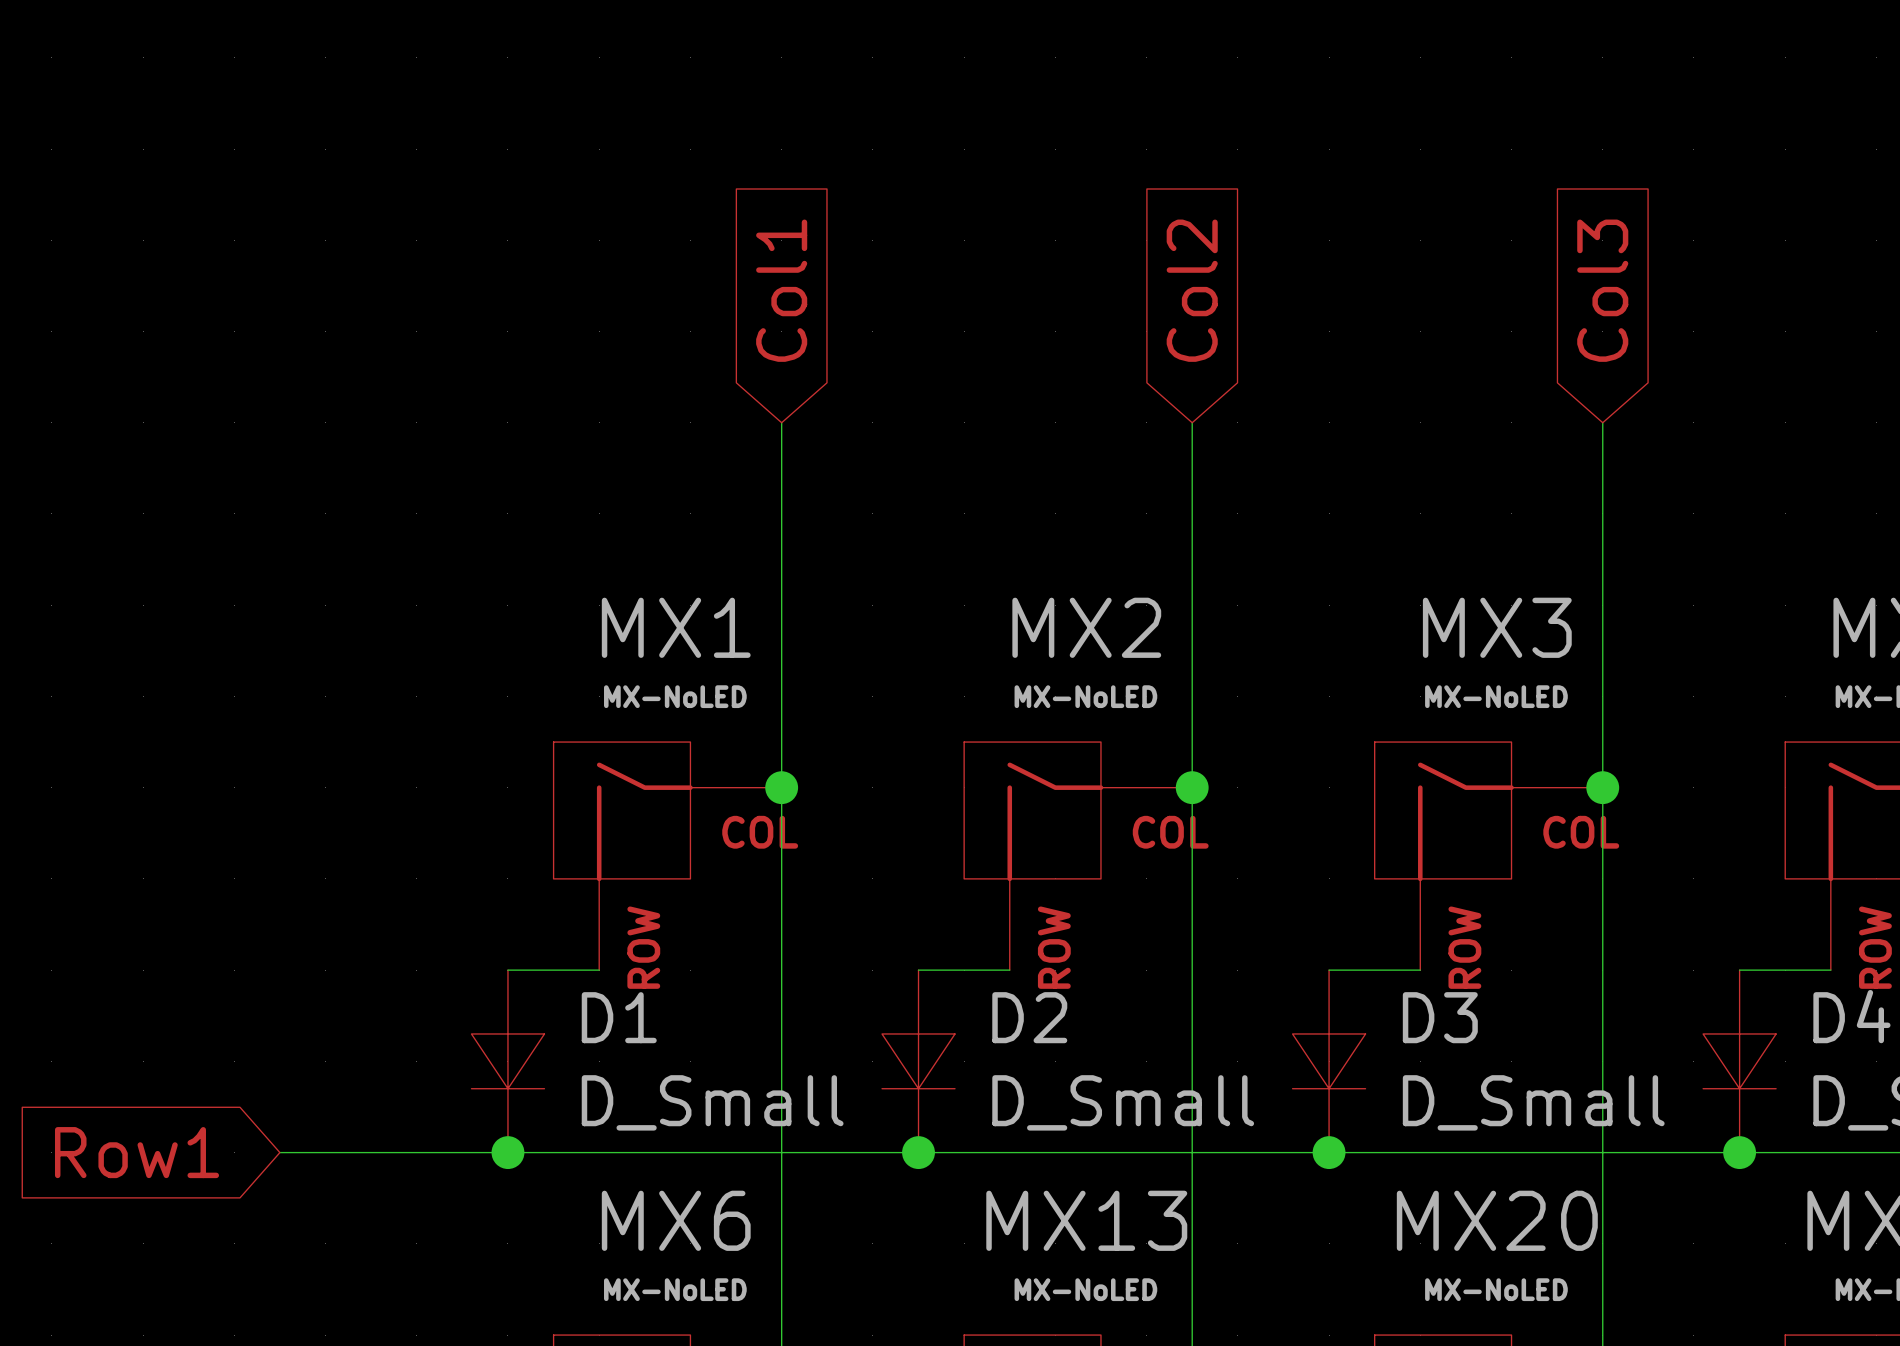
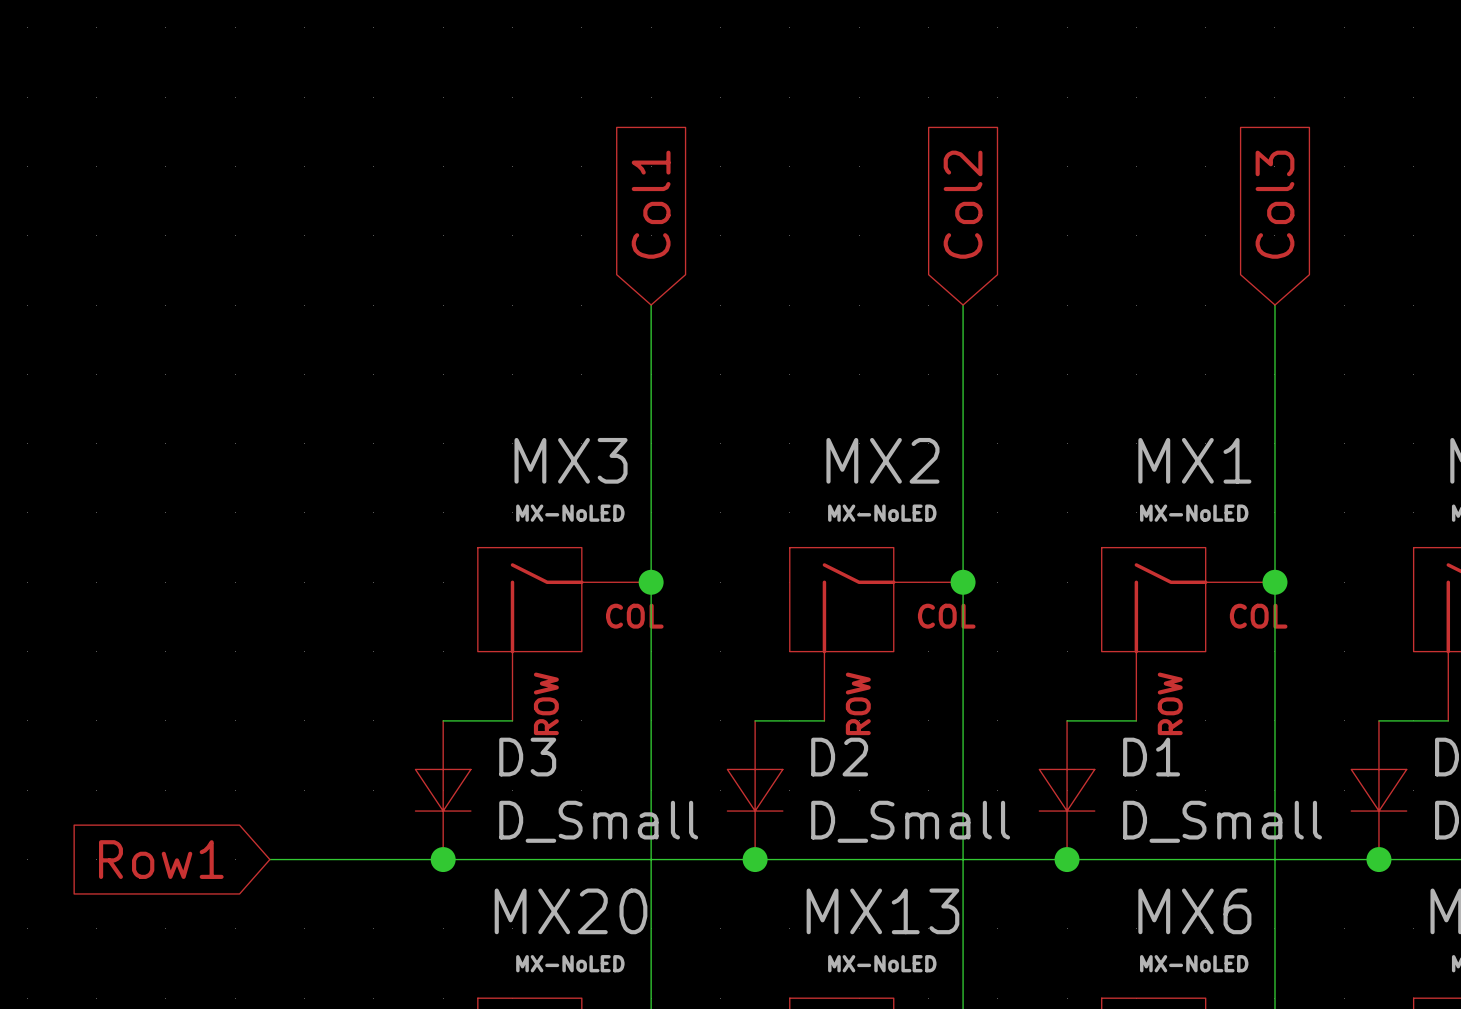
MX1 name: MX1 (676, 627) -> MX3 (571, 460)
MX3 name: MX3 (1497, 627) -> MX1 (1194, 460)
D1 name: D1 (619, 1017) -> D3 (527, 757)
D3 name: D3 (1440, 1017) -> D1 (1151, 757)
MX6 name: MX6 (676, 1220) -> MX20 (571, 911)
MX20 name: MX20 (1497, 1220) -> MX6 (1194, 911)

